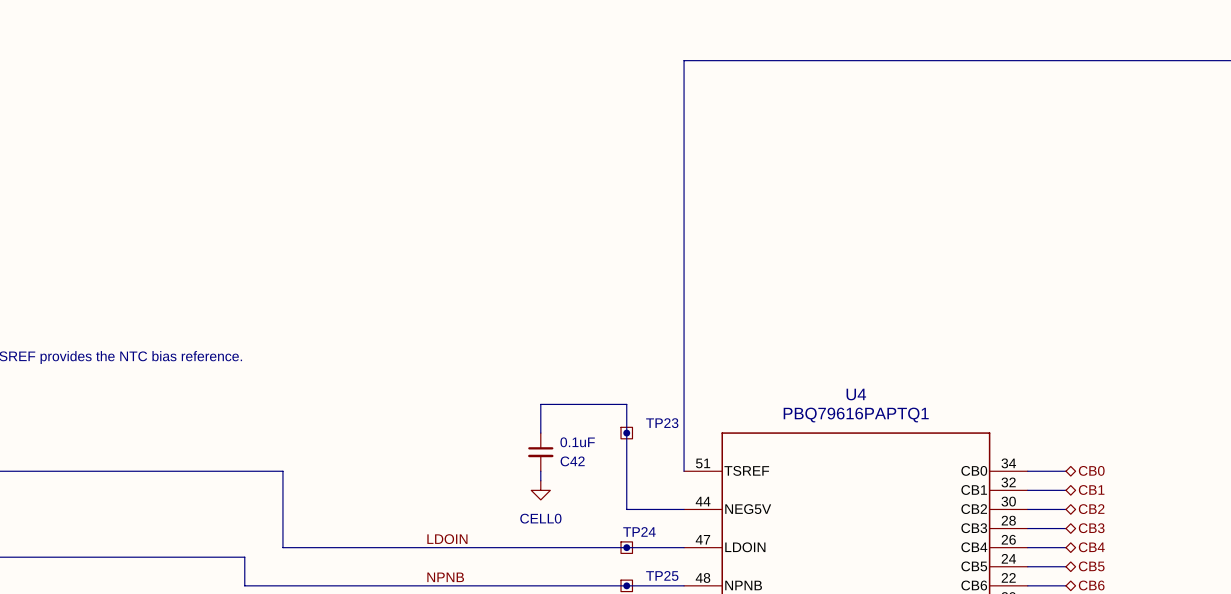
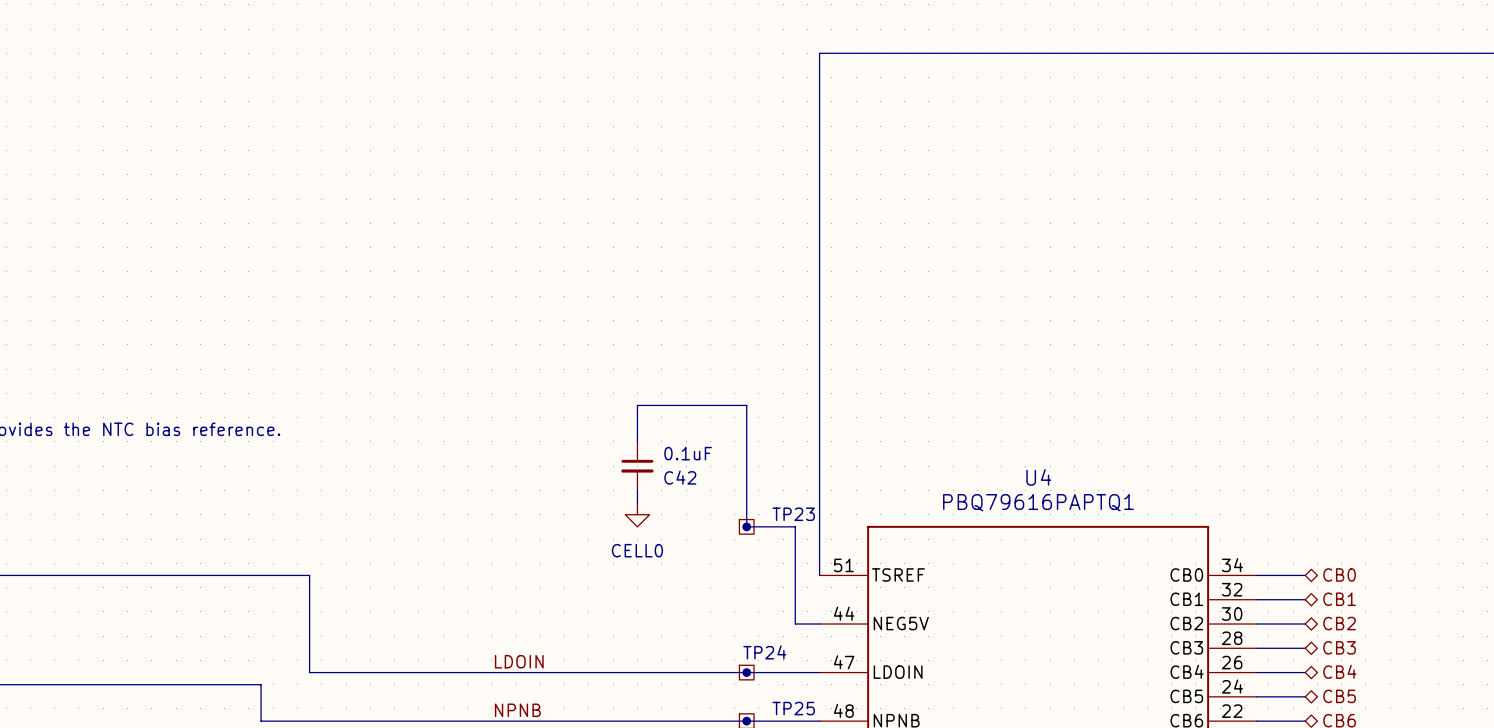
wire: (540, 404) (626, 404) -> (637, 441) (637, 405) (746, 405) (746, 490)
wire: (626, 433) (626, 509) (664, 509) -> (746, 526) (795, 526) (795, 624)
C42 position: (540, 452) -> (637, 466)
wire: (540, 471) (540, 480) -> none
power symbol position: CELL0 (540, 490) -> CELL0 (637, 514)

